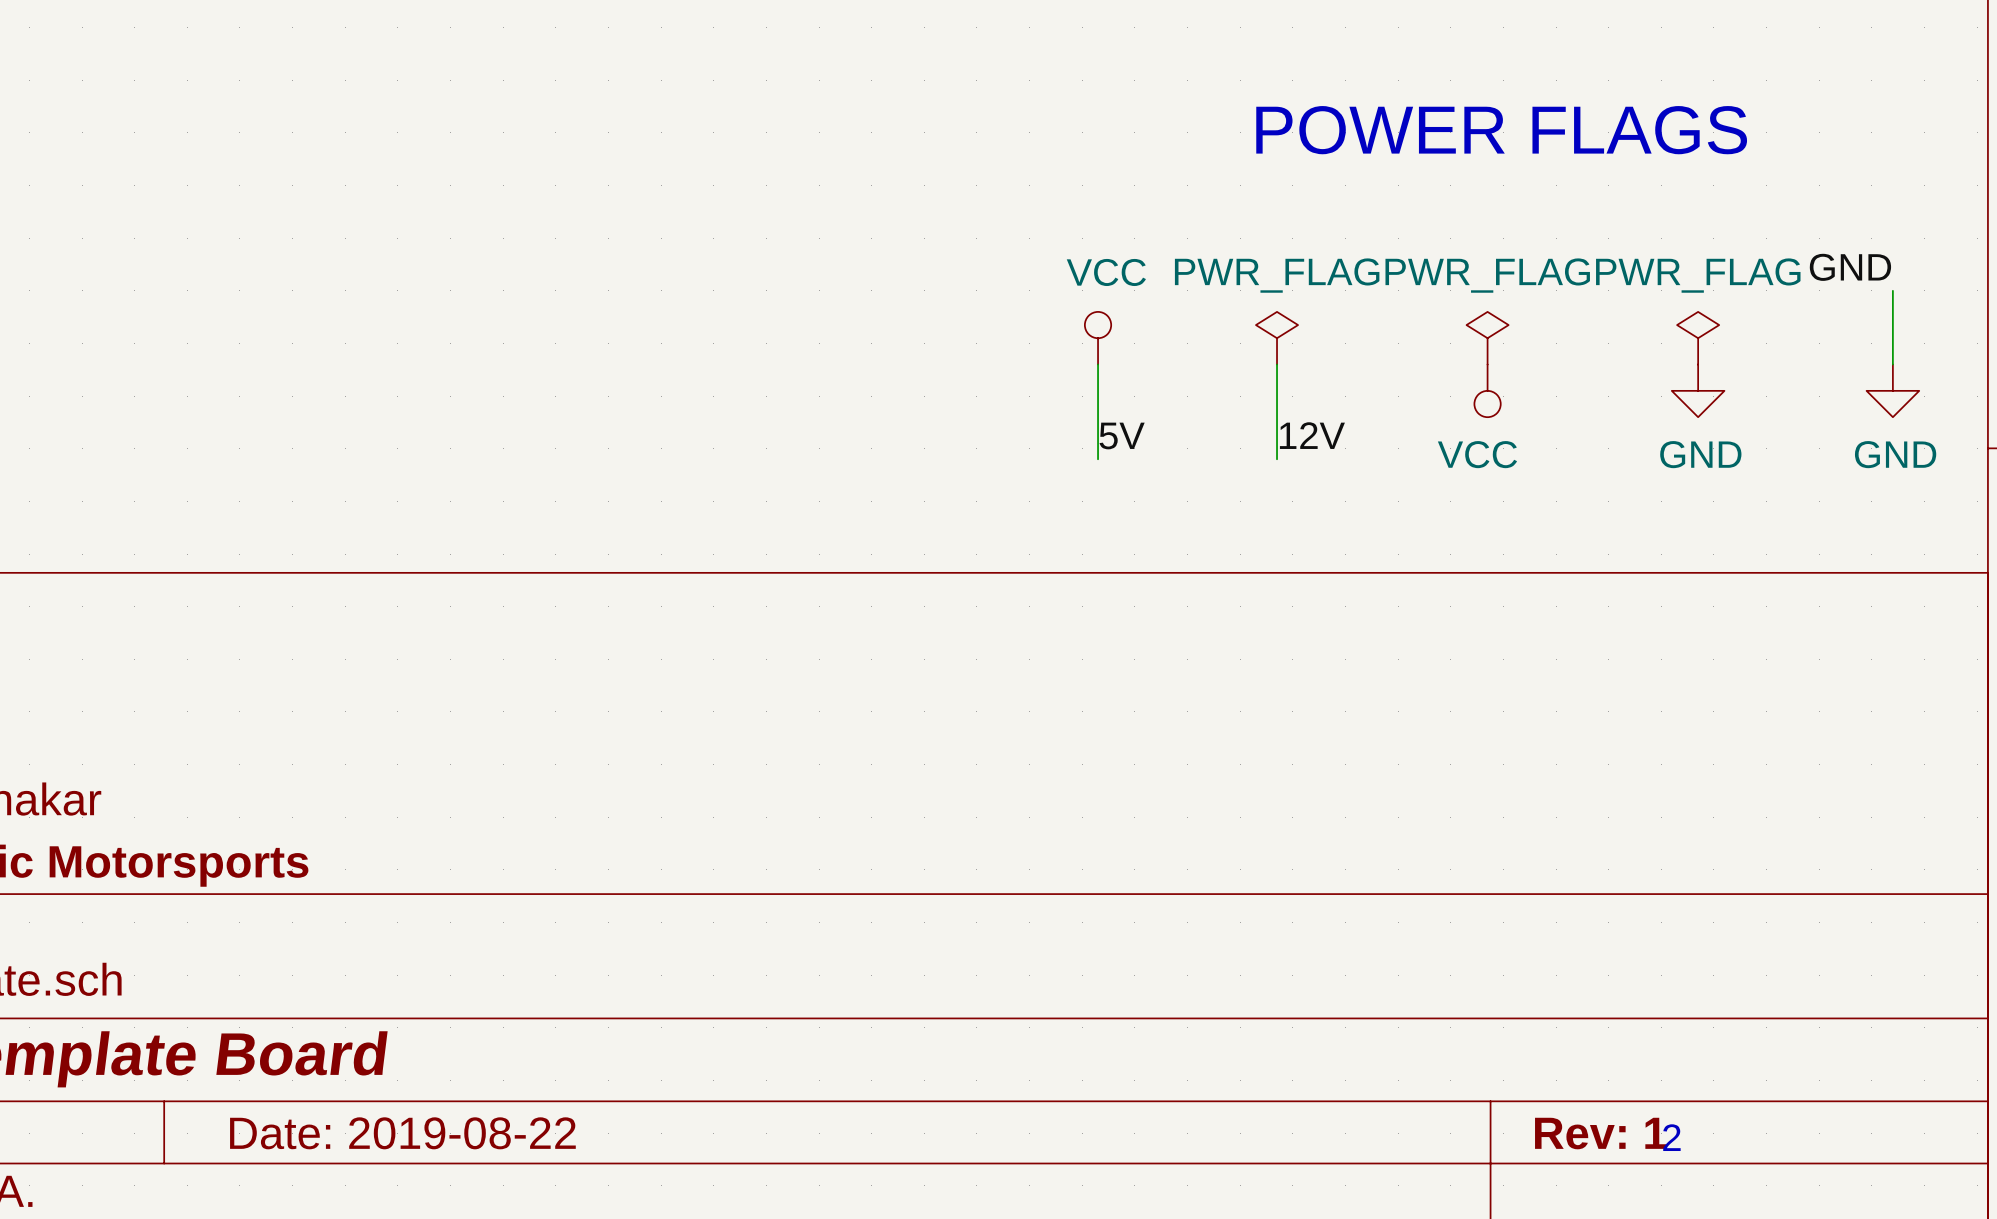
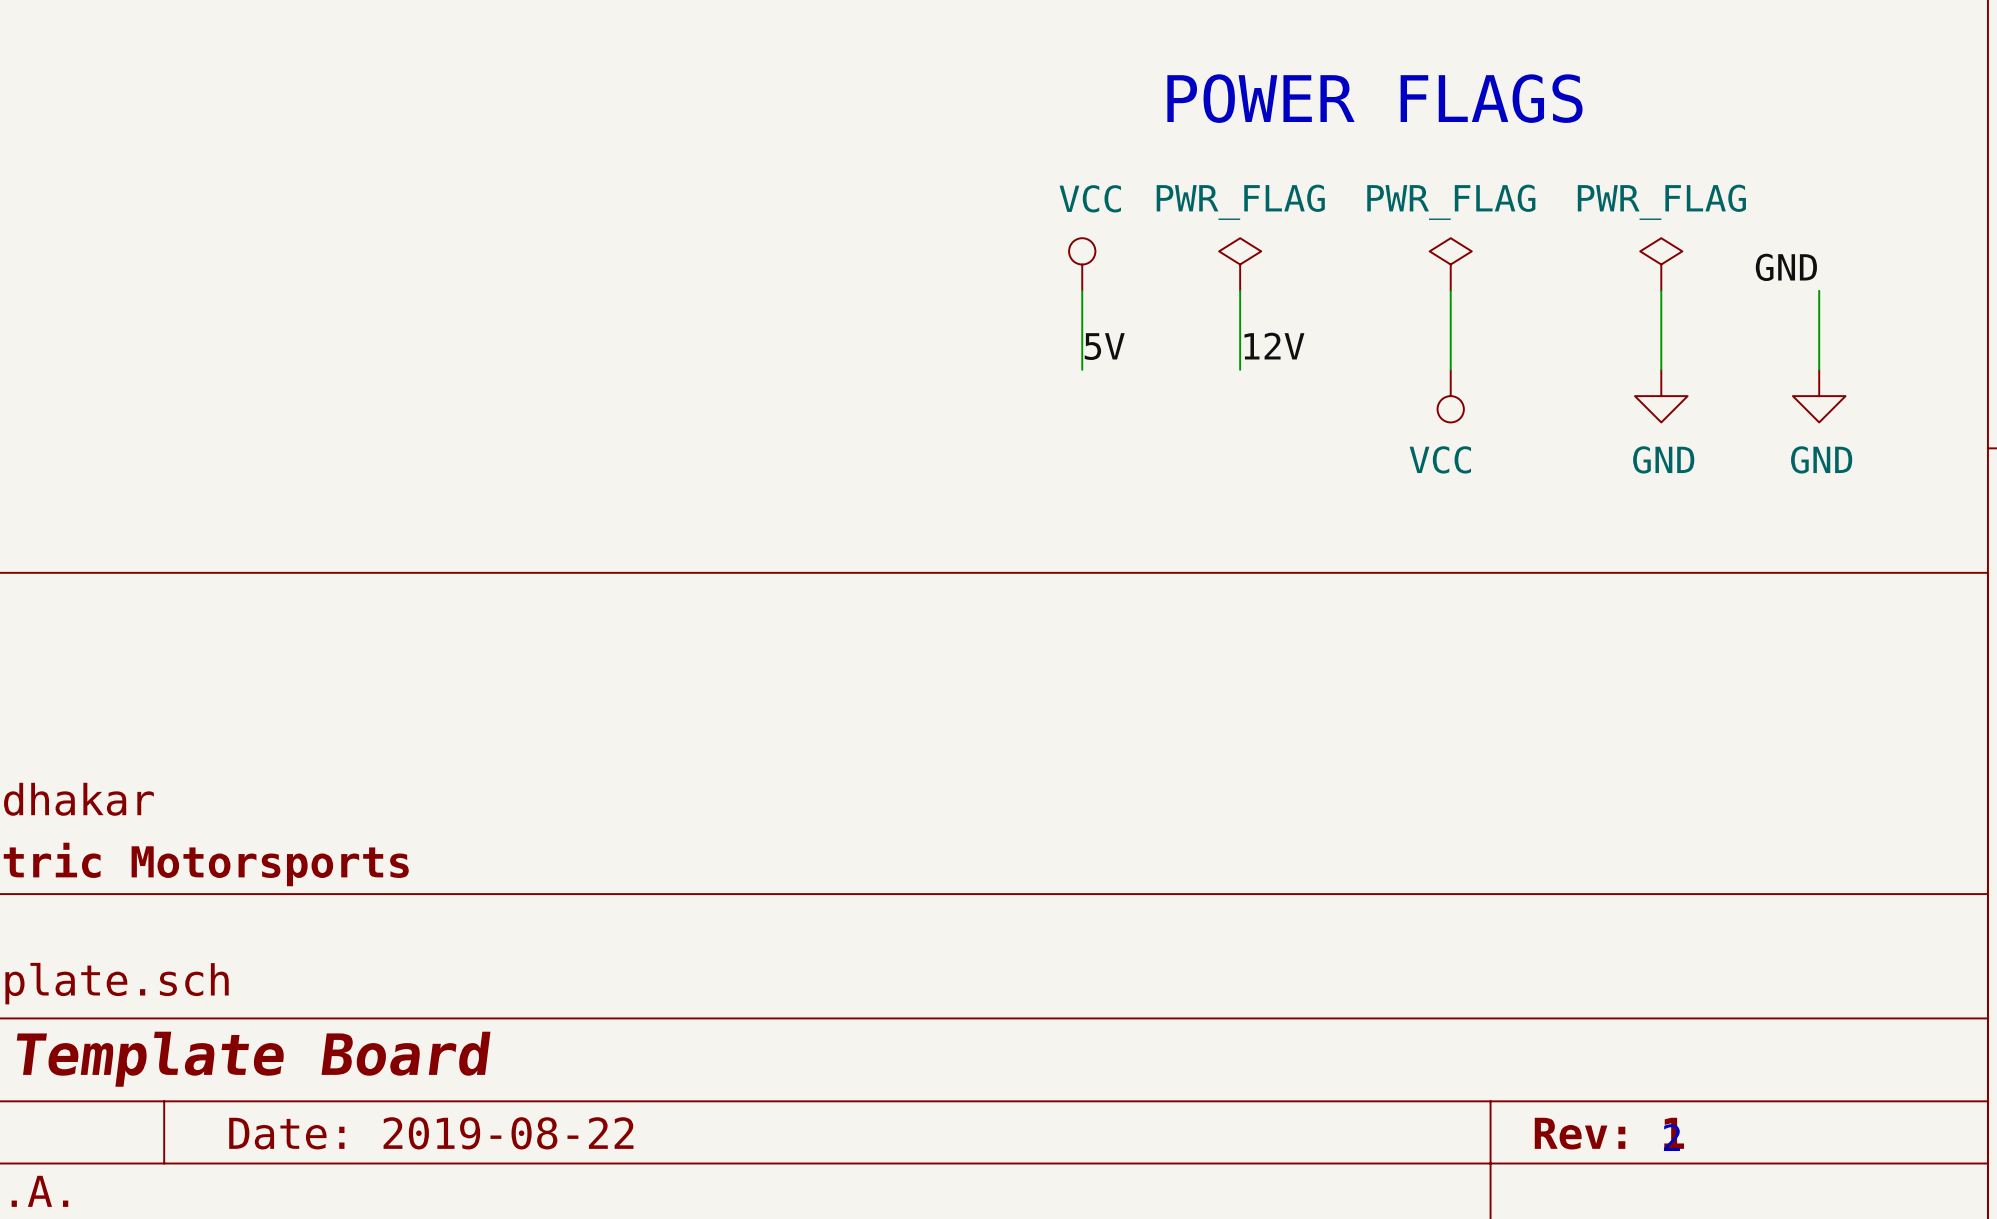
text position: POWER FLAGS (1501, 130) -> POWER FLAGS (1374, 98)
label position: GND (1850, 267) -> GND (1786, 267)
wire: none -> (1082, 290) (1082, 369)
wire: none -> (1240, 290) (1240, 369)
wire: none -> (1450, 290) (1450, 369)
wire: none -> (1661, 290) (1661, 369)
wire: none -> (1819, 290) (1819, 369)
wire: (1892, 290) (1892, 364) -> none
power symbol position: VCC (1098, 338) -> VCC (1082, 264)
power symbol position: PWR_FLAG (1277, 338) -> PWR_FLAG (1240, 264)
power symbol position: PWR_FLAG (1487, 338) -> PWR_FLAG (1450, 264)
power symbol position: PWR_FLAG (1698, 338) -> PWR_FLAG (1661, 264)
wire: (1098, 364) (1098, 459) -> none
wire: (1277, 364) (1277, 459) -> none
power symbol position: VCC (1487, 390) -> VCC (1450, 396)
power symbol position: GND (1698, 390) -> GND (1661, 396)
power symbol: GND (1892, 390) -> none
power symbol: none -> GND (1819, 396)
label position: 5V (1122, 435) -> 5V (1104, 346)
label position: 12V (1312, 435) -> 12V (1274, 346)

